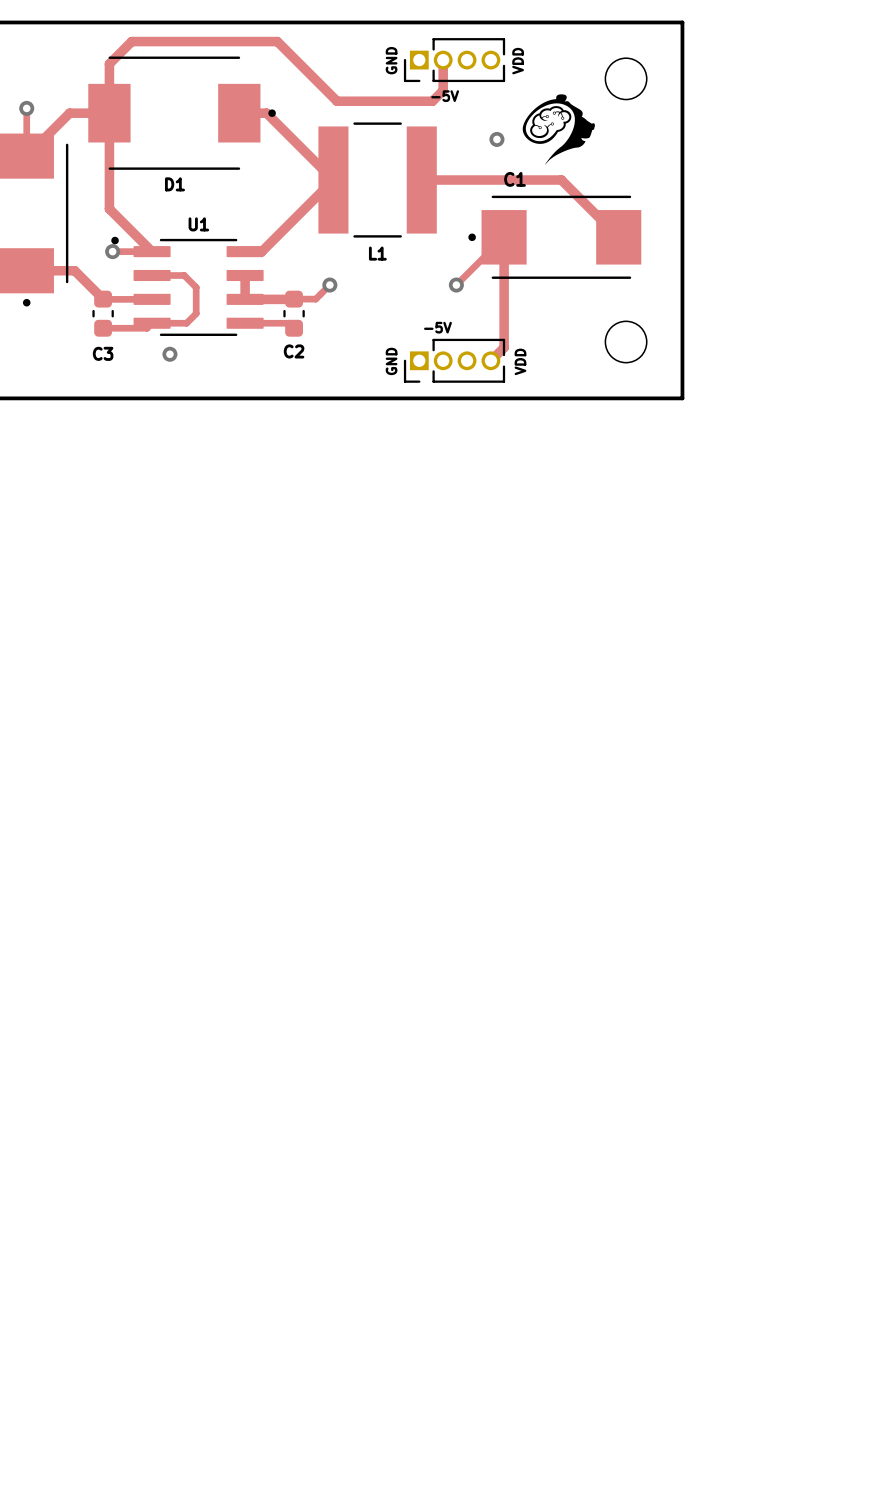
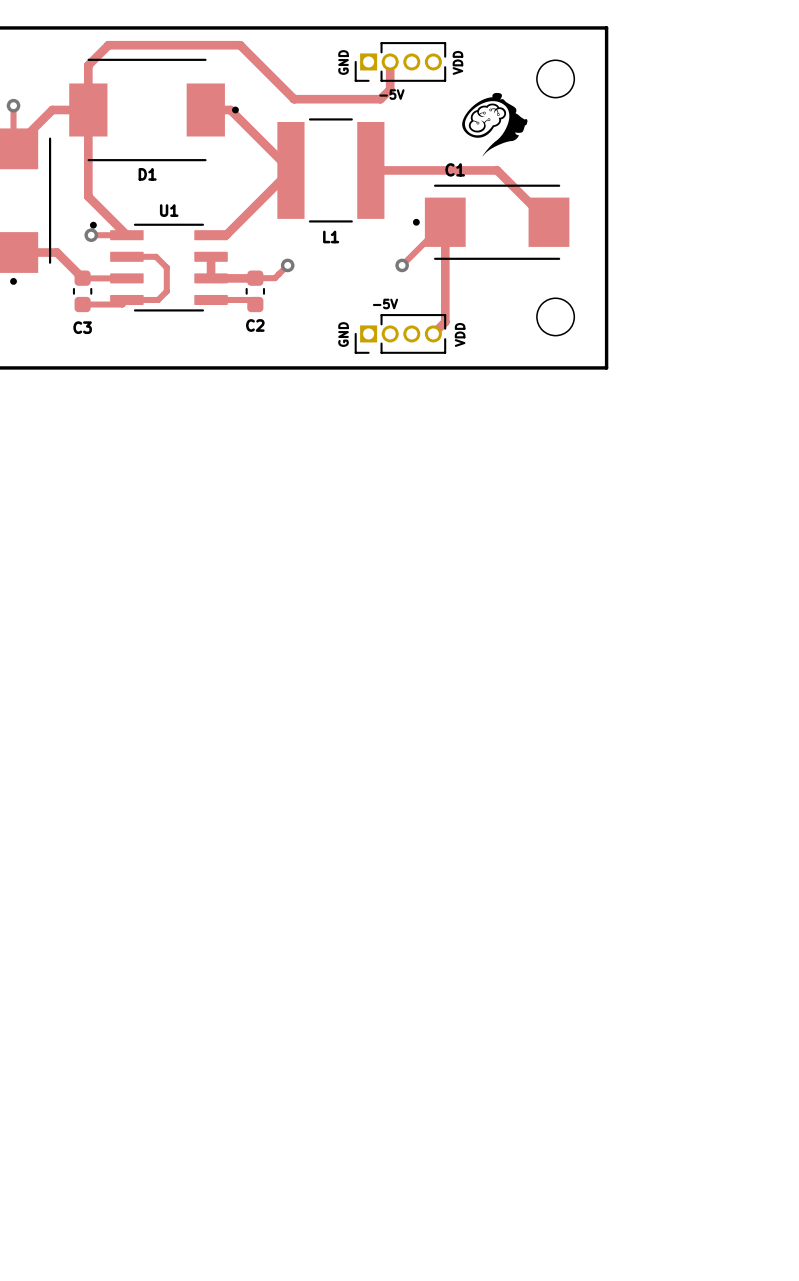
via: (496, 139) -> none
via: (169, 354) -> none

